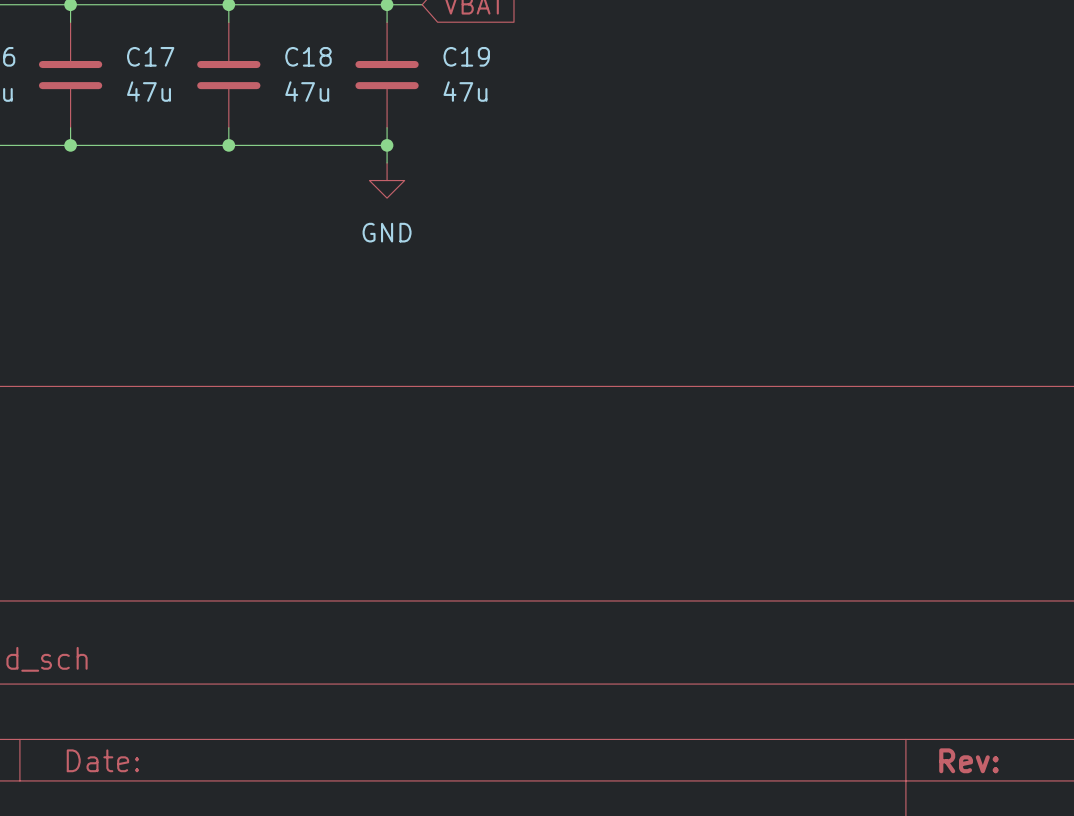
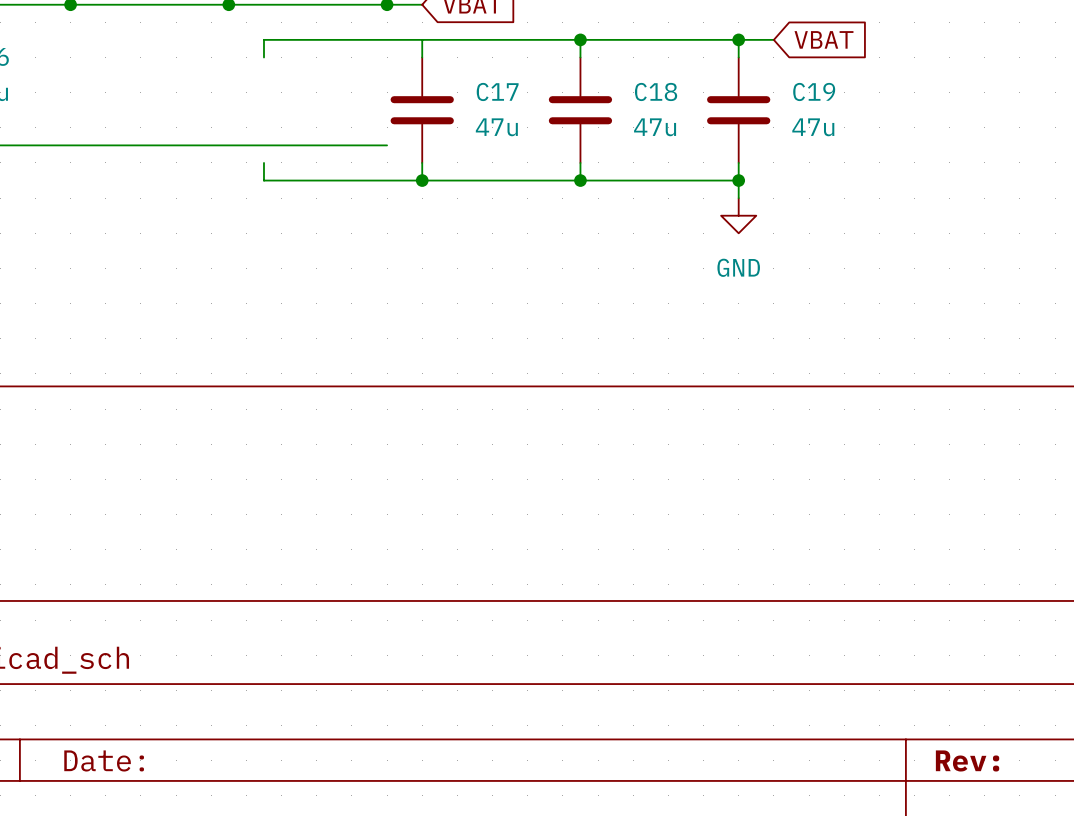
wire: (70, 4) (70, 22) -> none
wire: (228, 4) (228, 22) -> (422, 39) (422, 57)
wire: (387, 4) (387, 22) -> (580, 39) (580, 57)
junction: none -> (580, 39)
wire: none -> (738, 39) (738, 57)
junction: none -> (738, 39)
wire: none -> (773, 39) (263, 39) (263, 57)
global label: none -> VBAT (824, 39)
C17 position: (70, 75) -> (422, 110)
C18 position: (228, 75) -> (580, 110)
C19 position: (387, 75) -> (738, 110)
wire: (70, 127) (70, 145) -> none
wire: (228, 127) (228, 145) -> (422, 162) (422, 180)
wire: (387, 127) (387, 162) -> none
junction: (70, 145) -> none
junction: (228, 145) -> none
junction position: (387, 145) -> (422, 180)
wire: none -> (263, 162) (263, 180) (738, 180)
wire: none -> (580, 162) (580, 180)
wire: none -> (738, 162) (738, 198)
power symbol: GND (387, 180) -> none
junction: none -> (580, 180)
junction: none -> (738, 180)
power symbol: none -> GND (738, 215)

